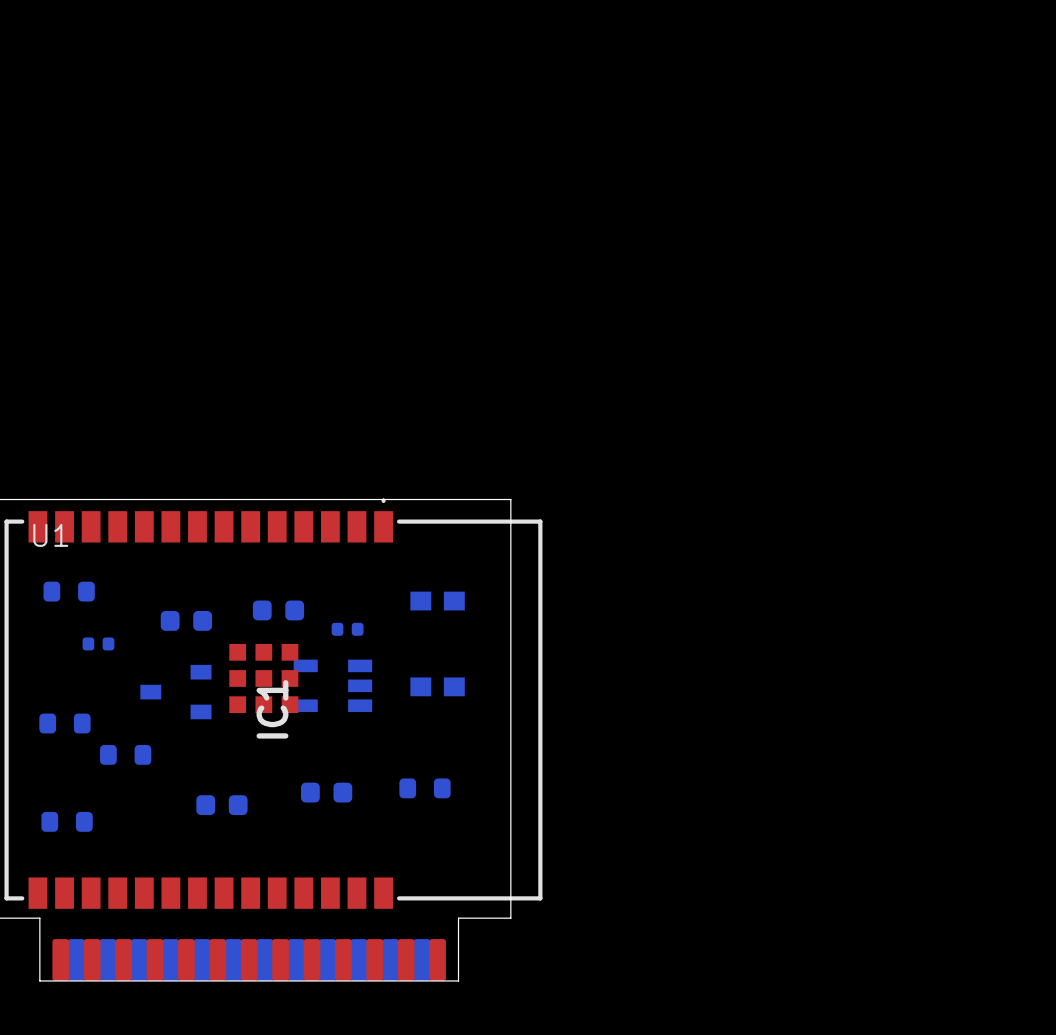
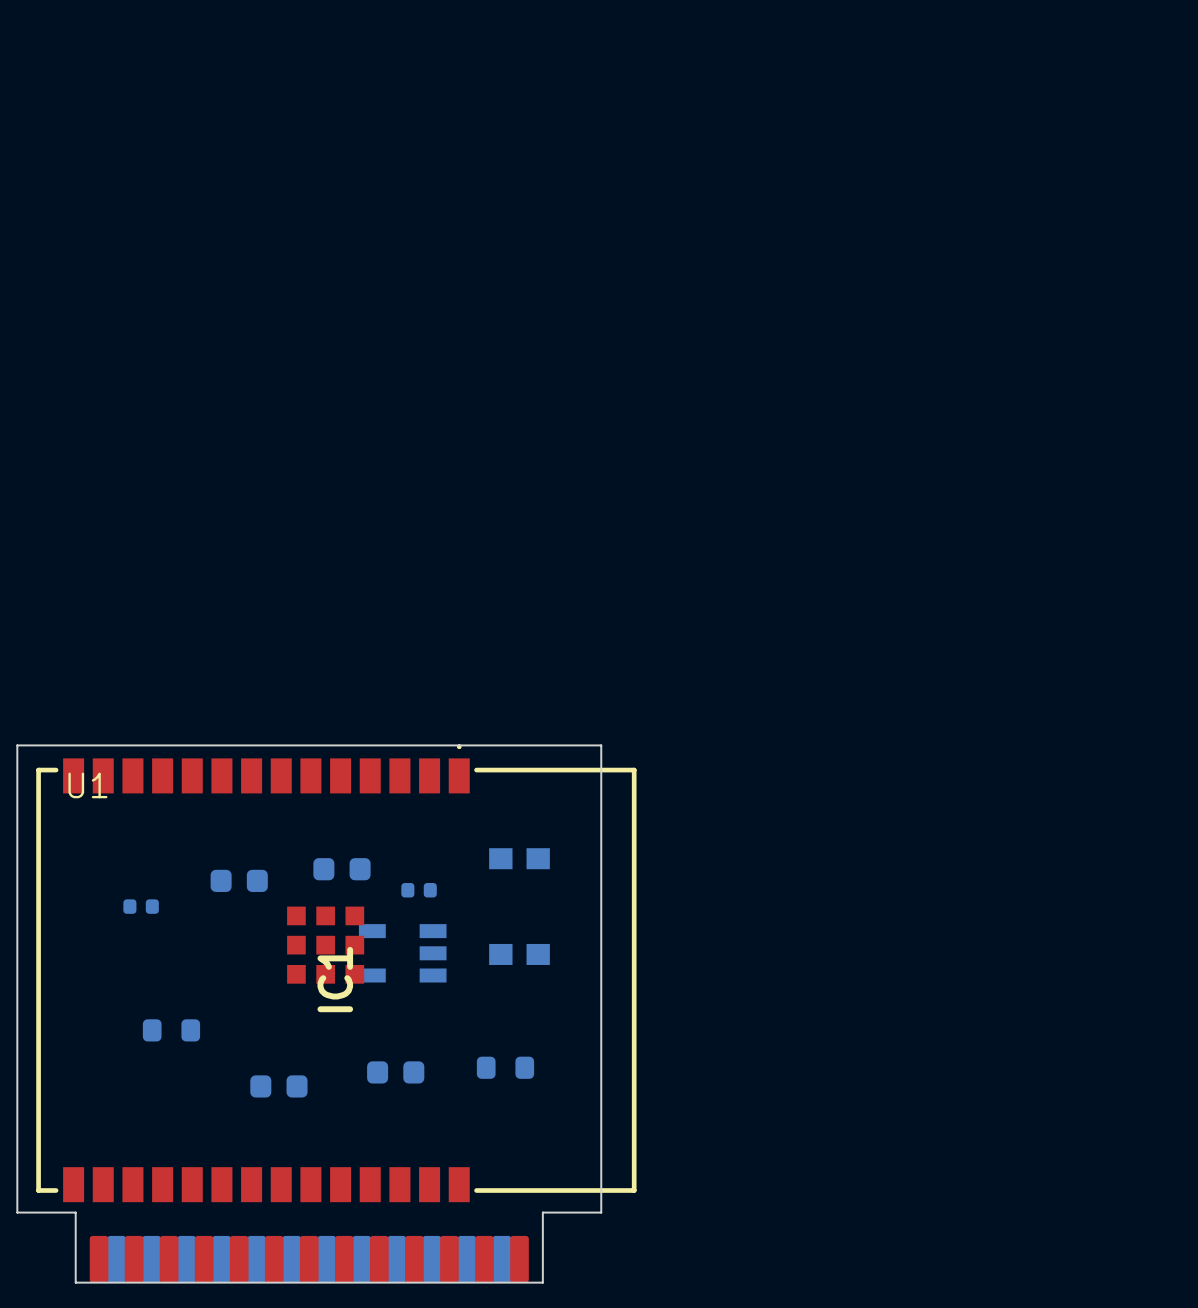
part: (69, 591) -> none
part: (175, 692) -> none
part: (64, 723) -> none
part: (67, 821) -> none

